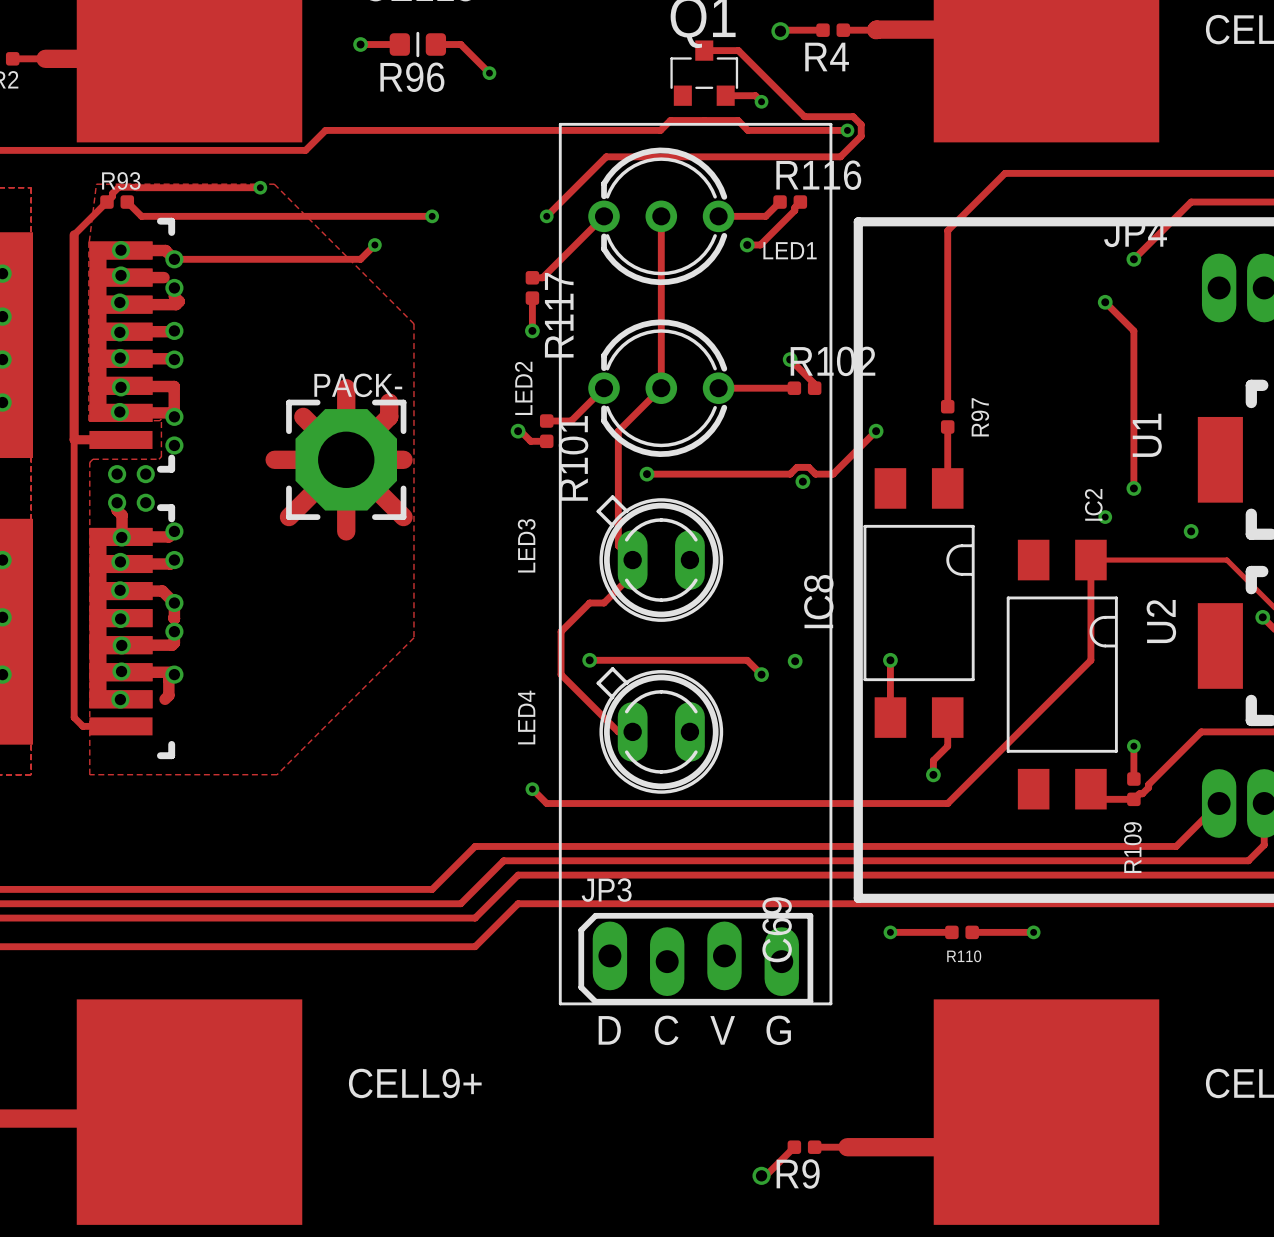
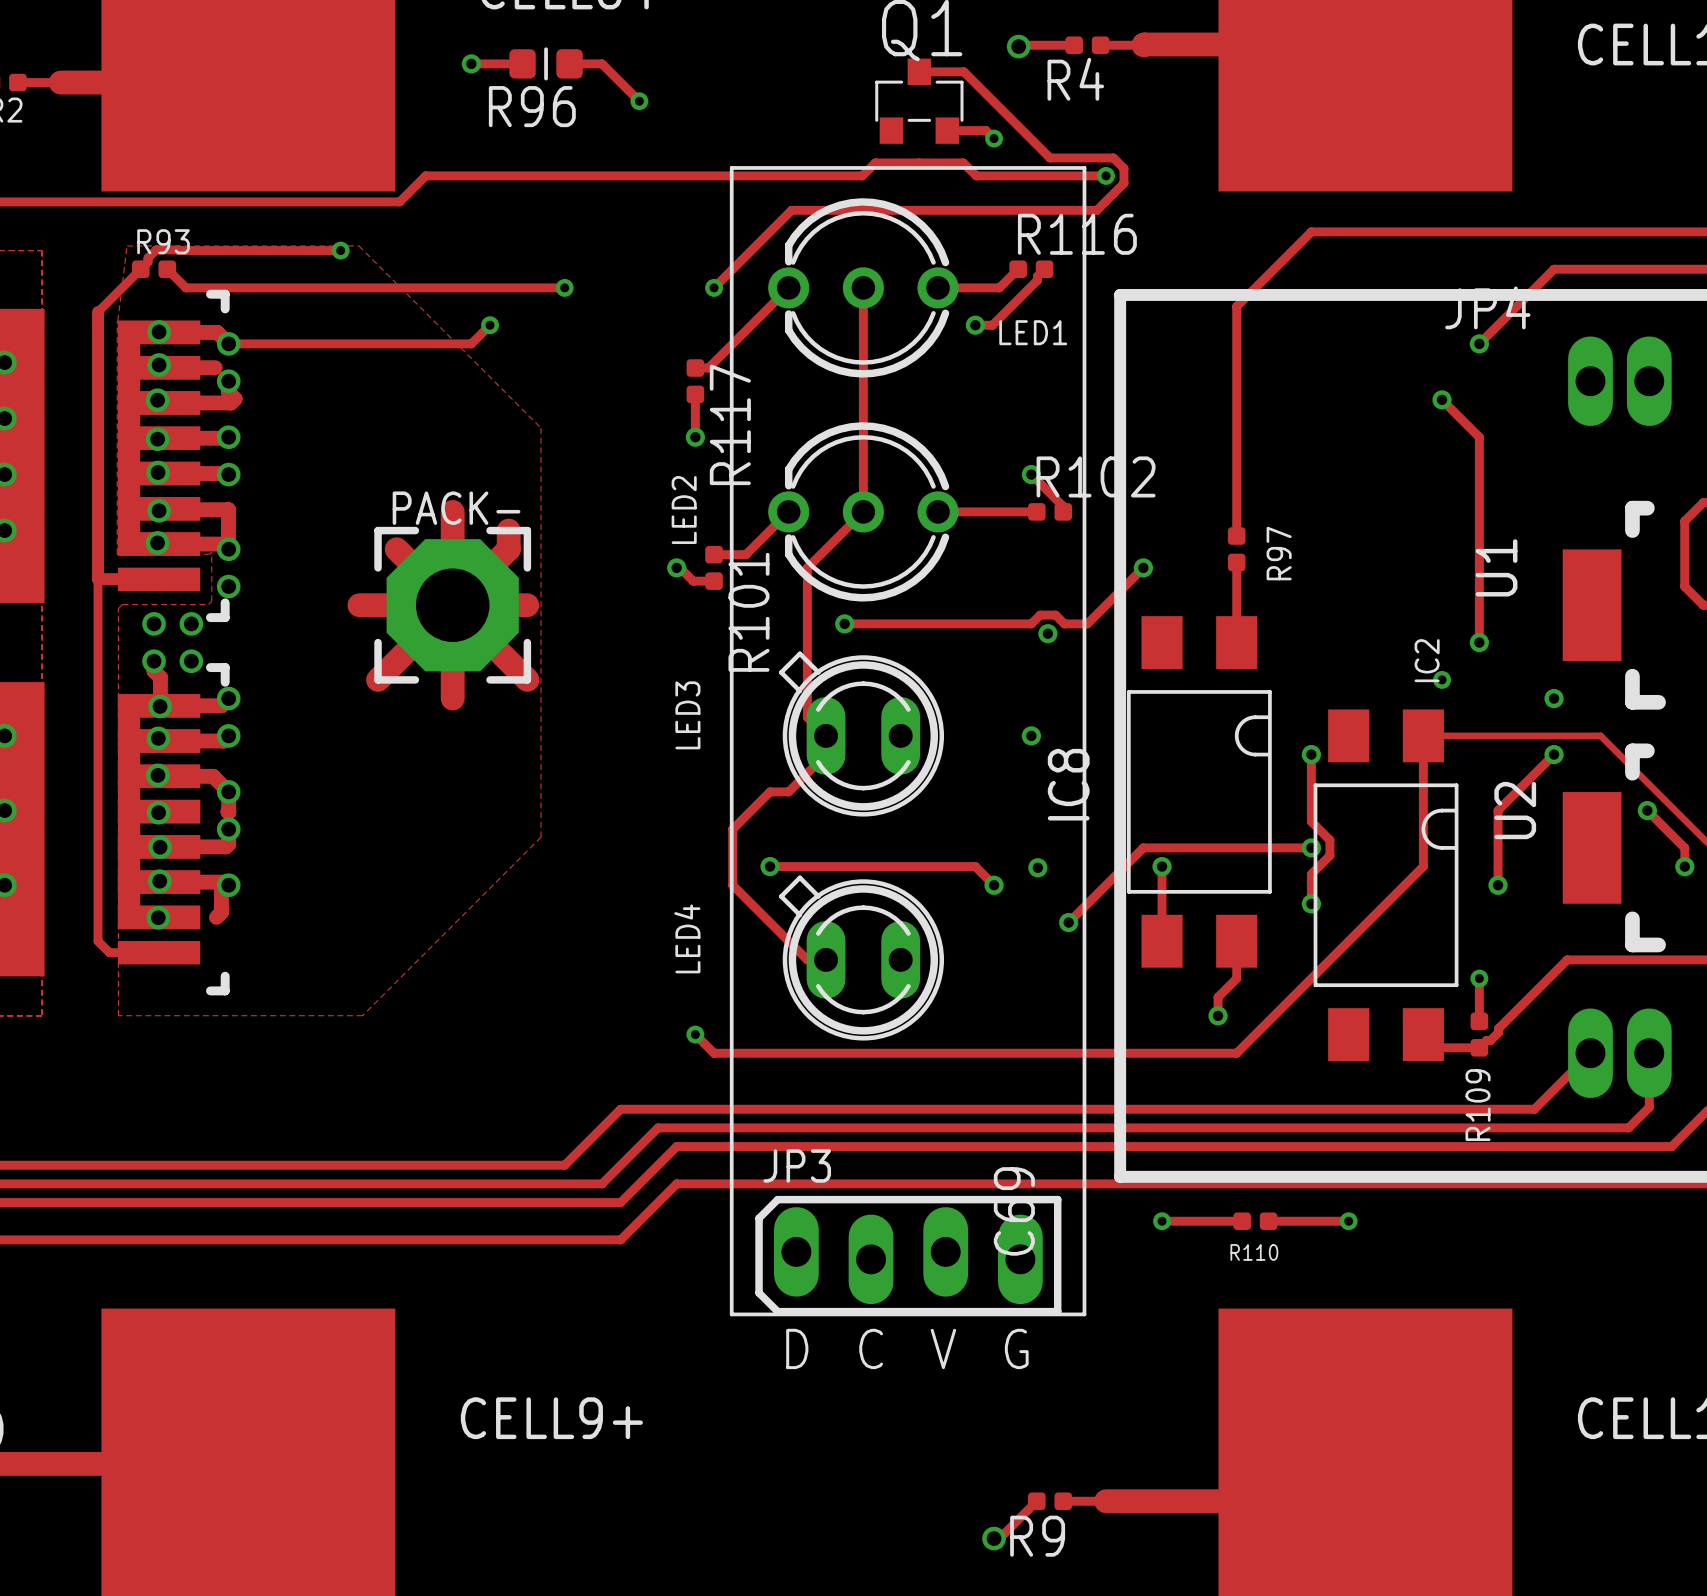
via: none -> (1031, 735)
track: none -> (1311, 754) (1311, 821) (1329, 840) (1329, 855) (1311, 874) (1311, 903)
via: none -> (1311, 754)
track: none -> (1554, 754) (1498, 810) (1498, 885)
via: none -> (1554, 754)
track: none -> (1311, 847) (1143, 847) (1068, 922)
via: none -> (1311, 847)
via: none -> (1498, 885)
via: none -> (1311, 903)
via: none -> (1068, 922)

